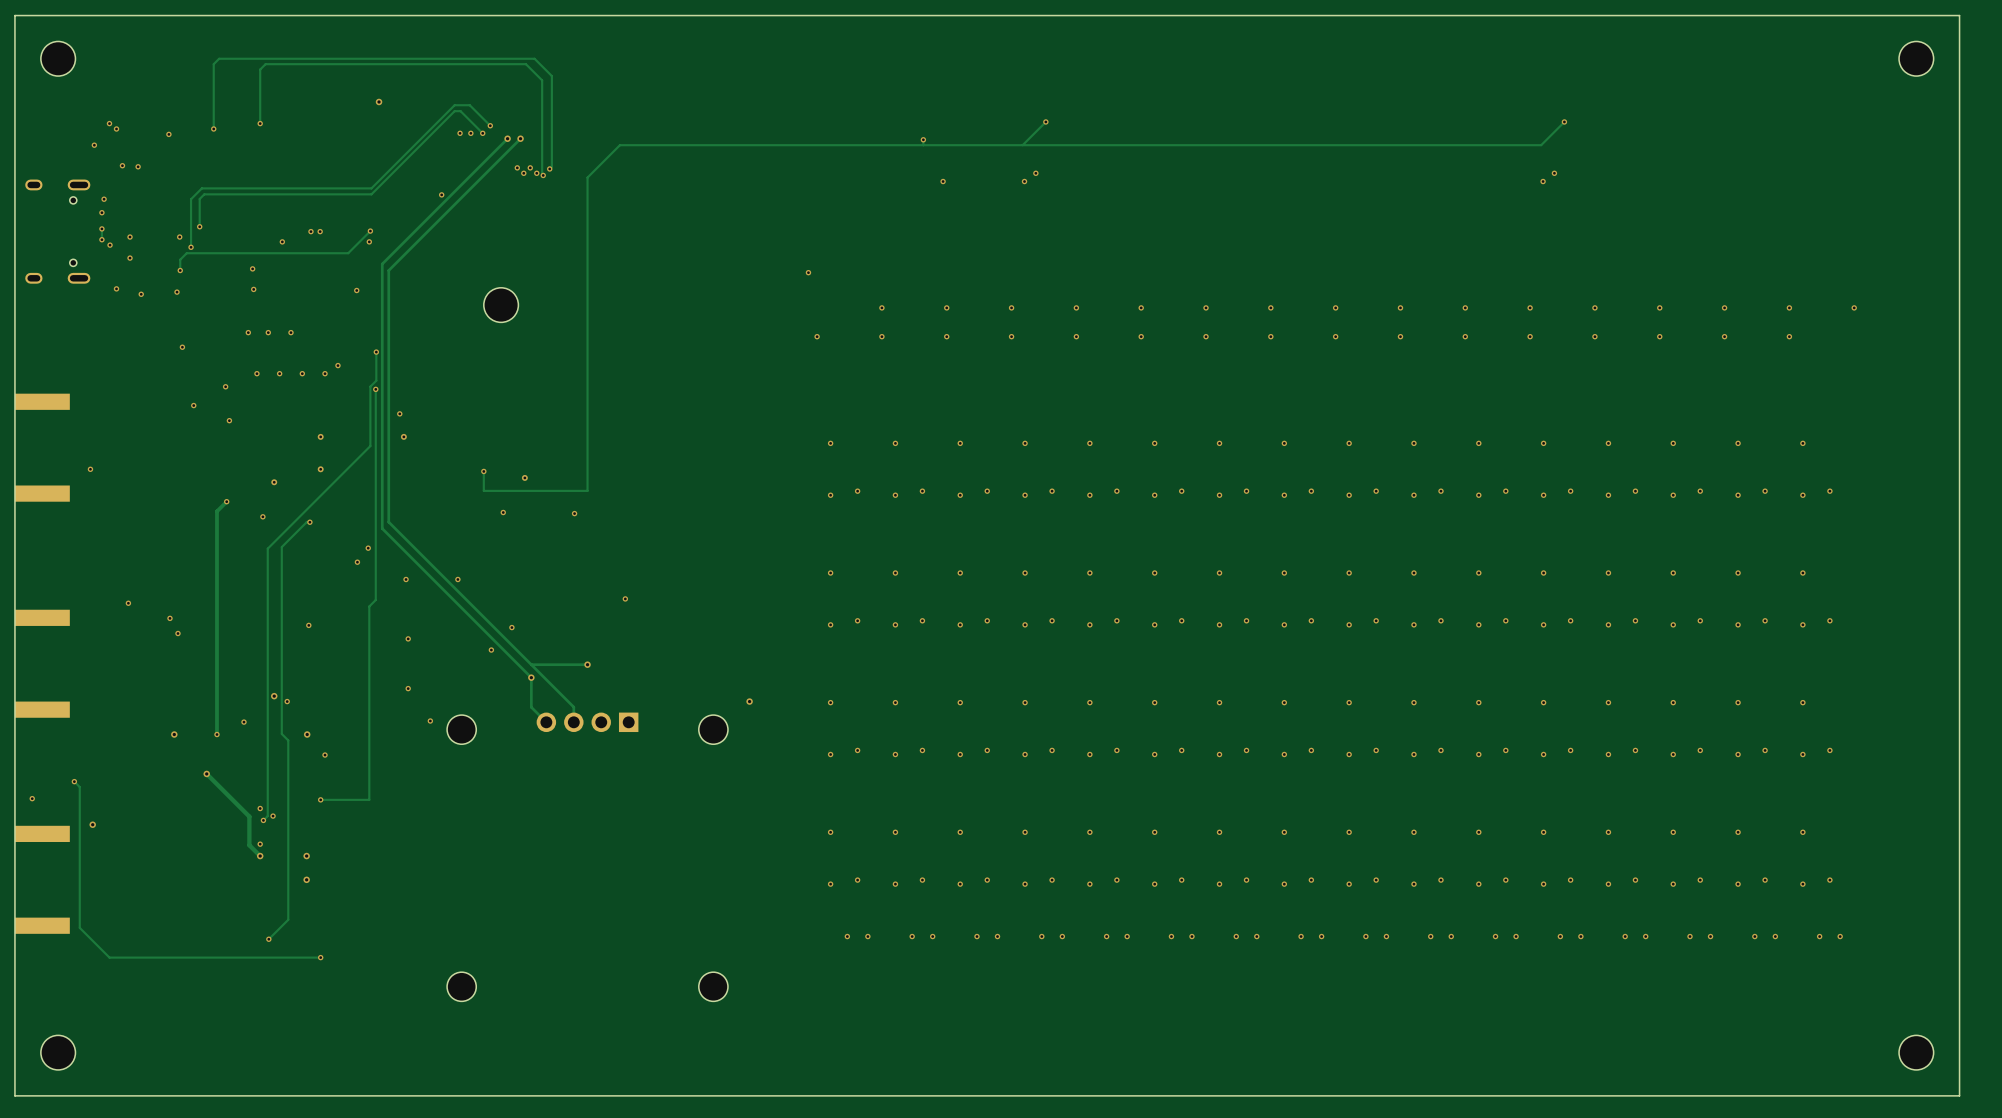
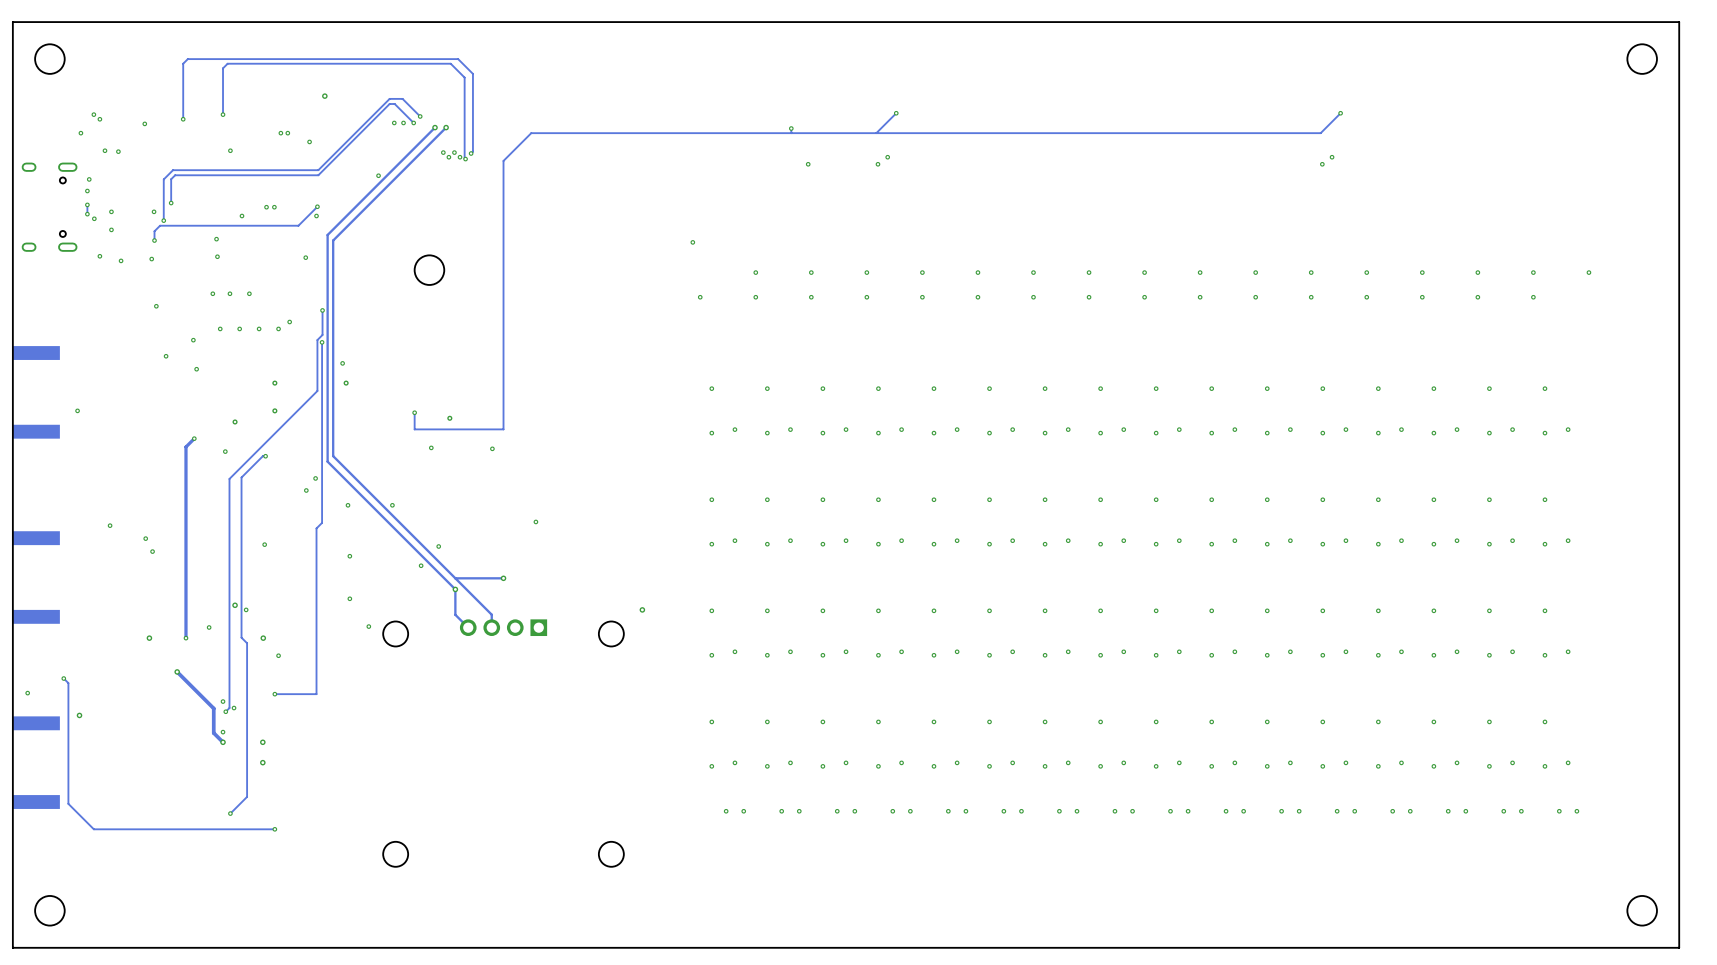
via: none -> (280, 133)
via: none -> (287, 133)
via: none -> (309, 141)
via: none -> (230, 150)

